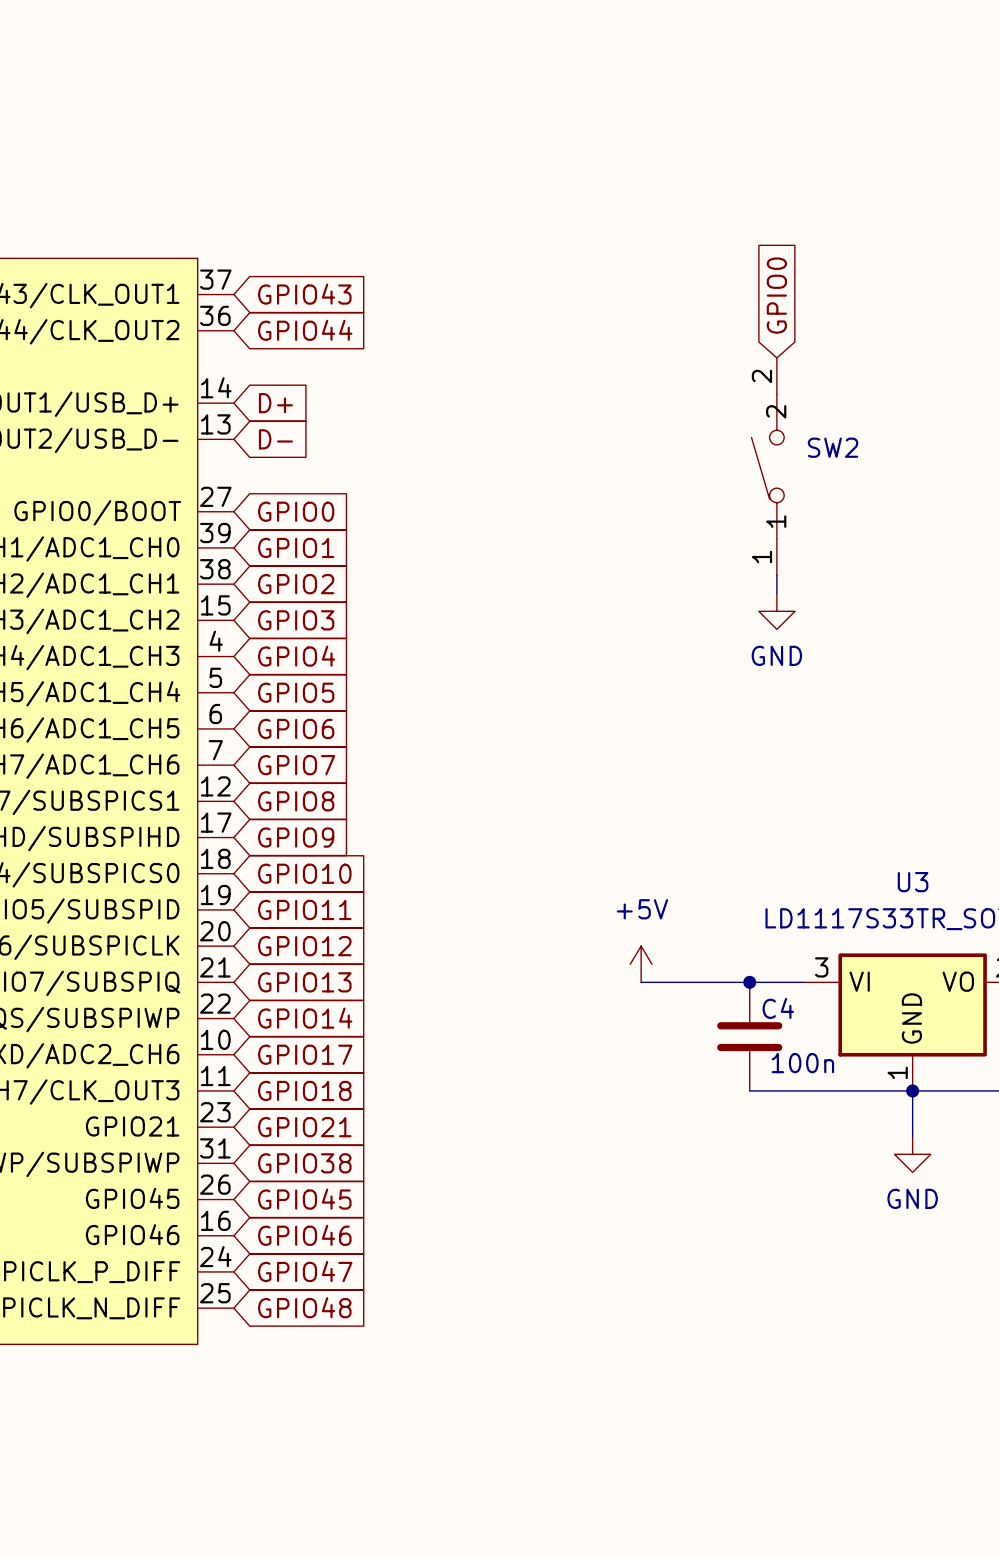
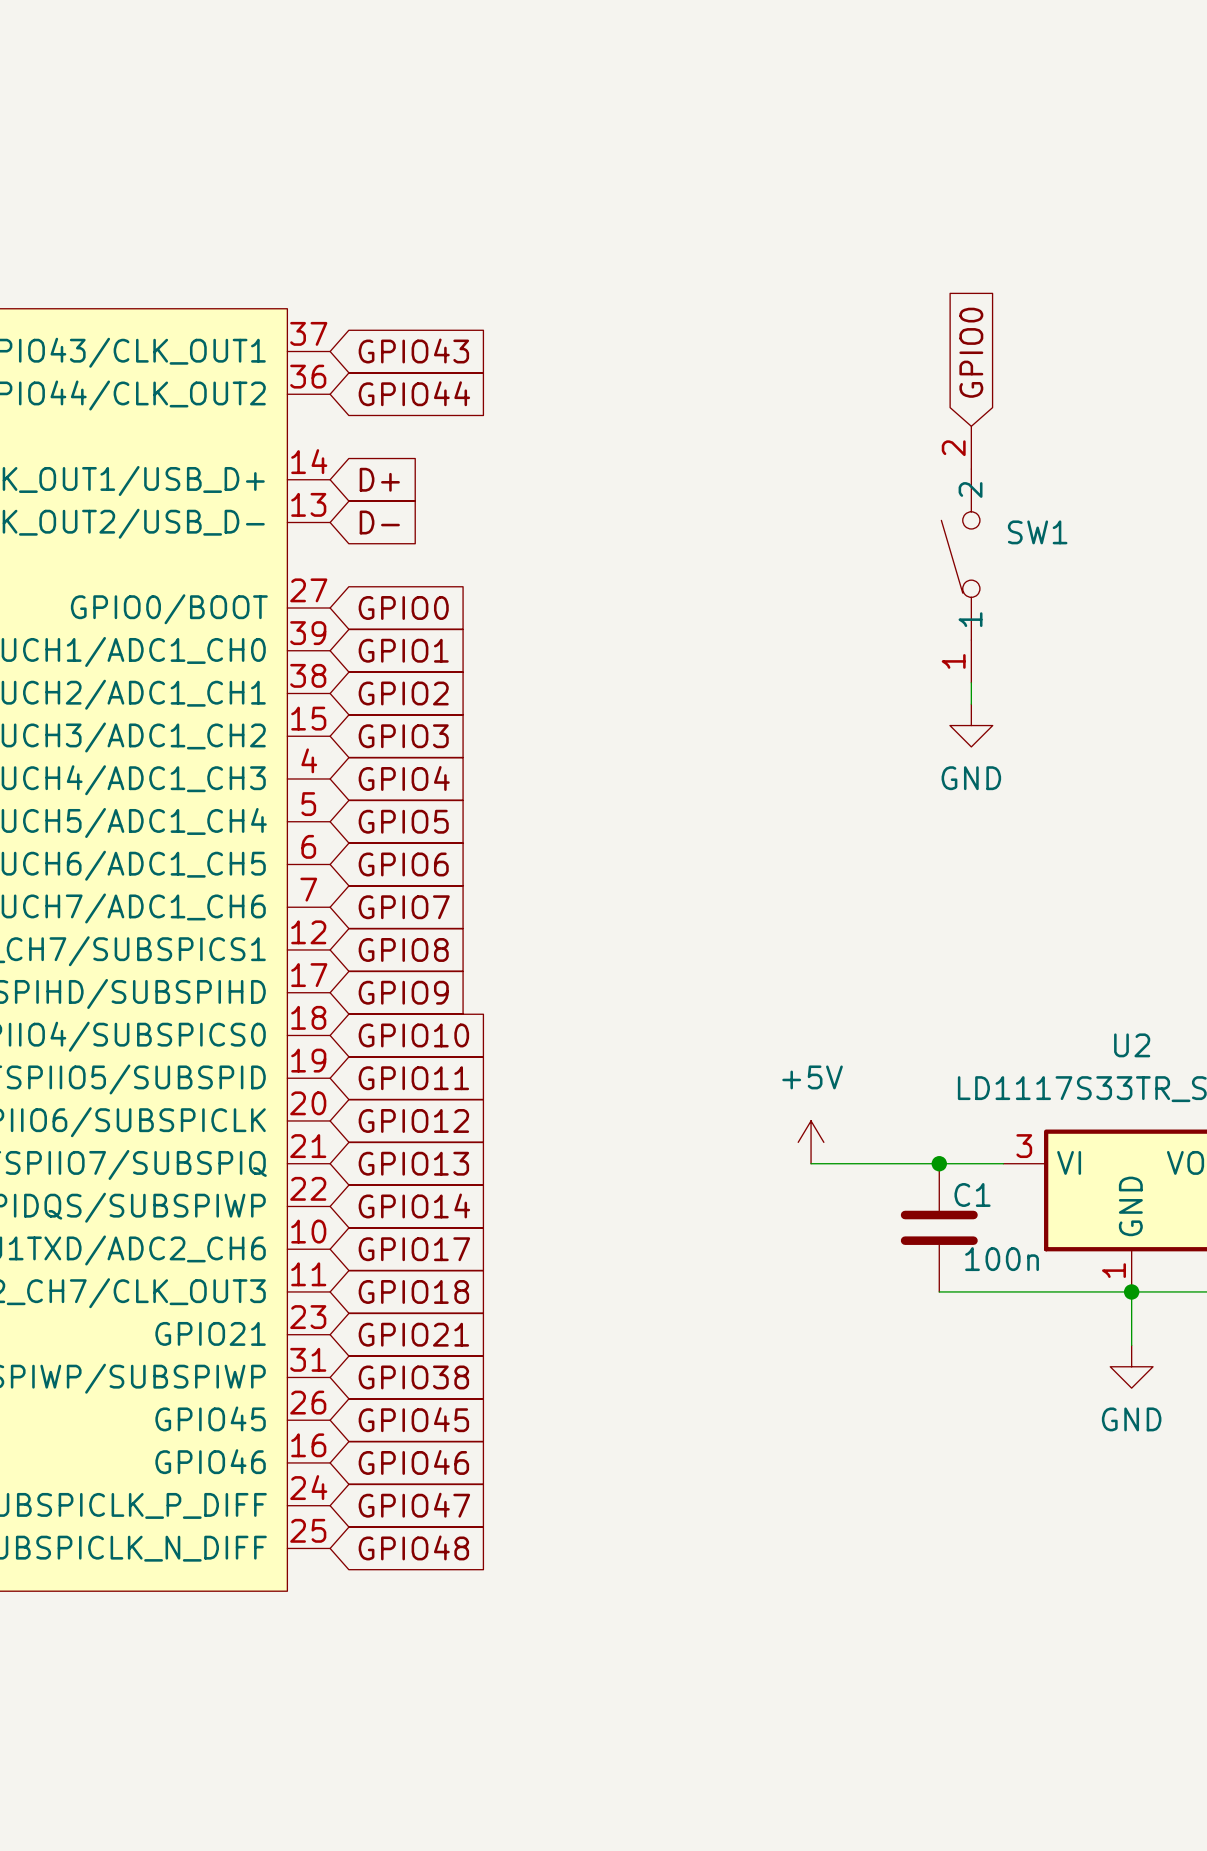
SW2 name: SW2 (833, 447) -> SW1 (1037, 532)
U3 name: U3 (913, 882) -> U2 (1132, 1045)
C4 name: C4 (778, 1008) -> C1 (972, 1194)

